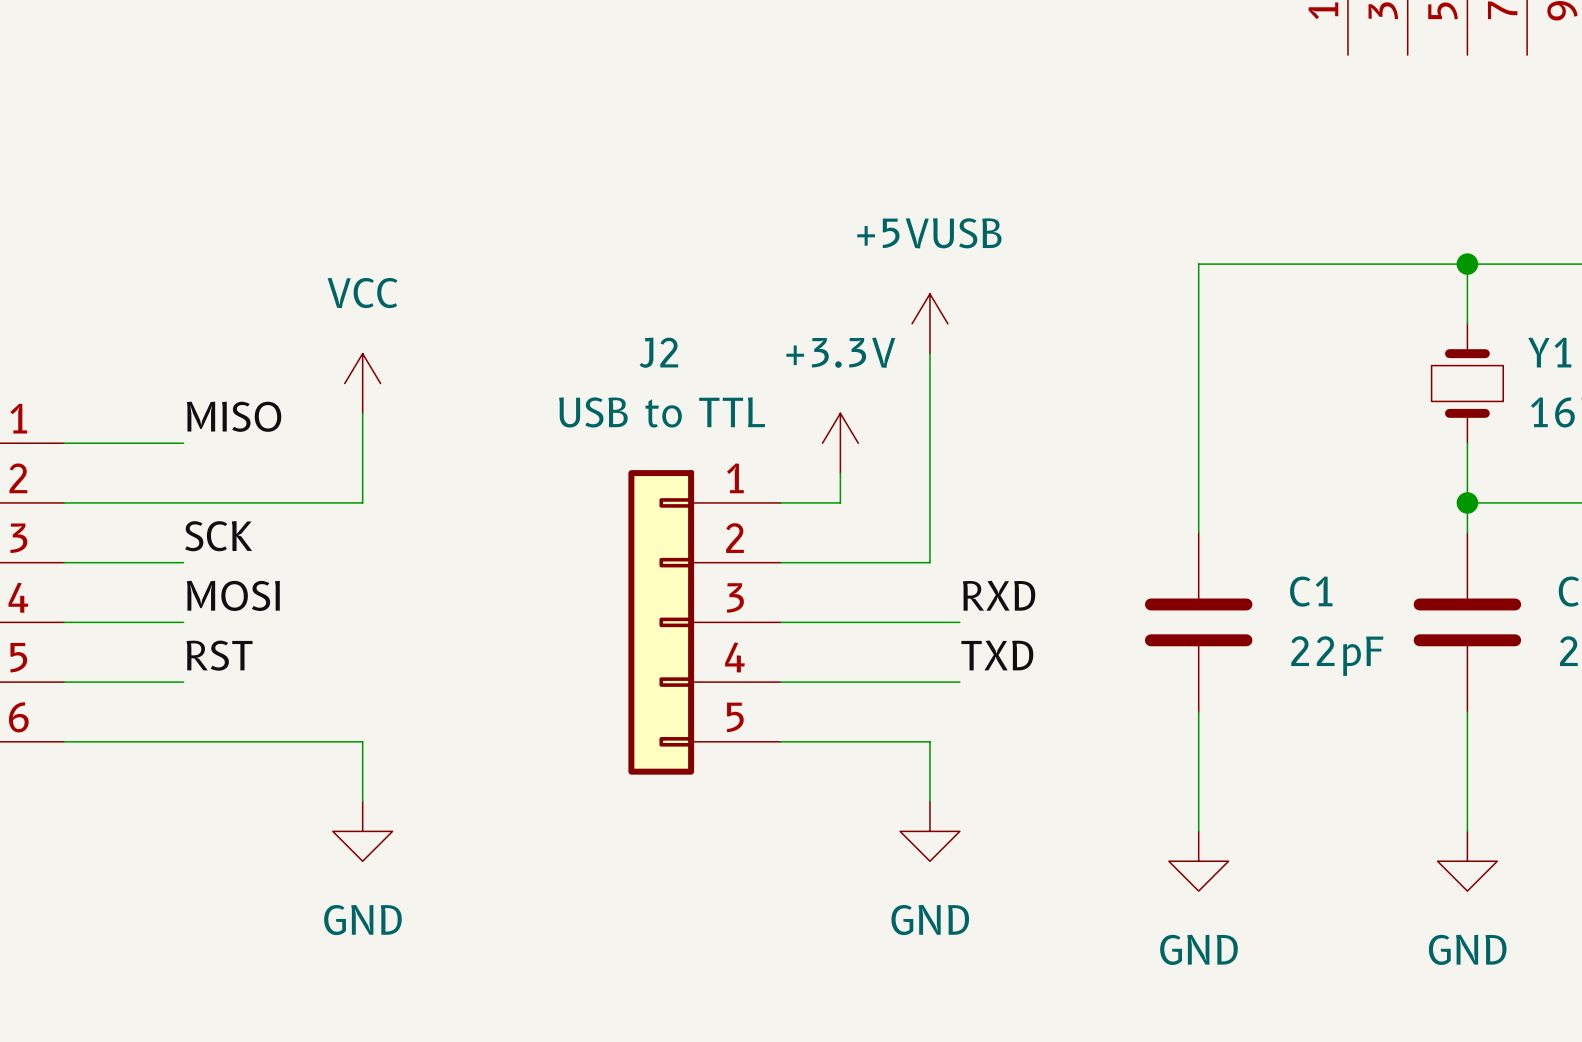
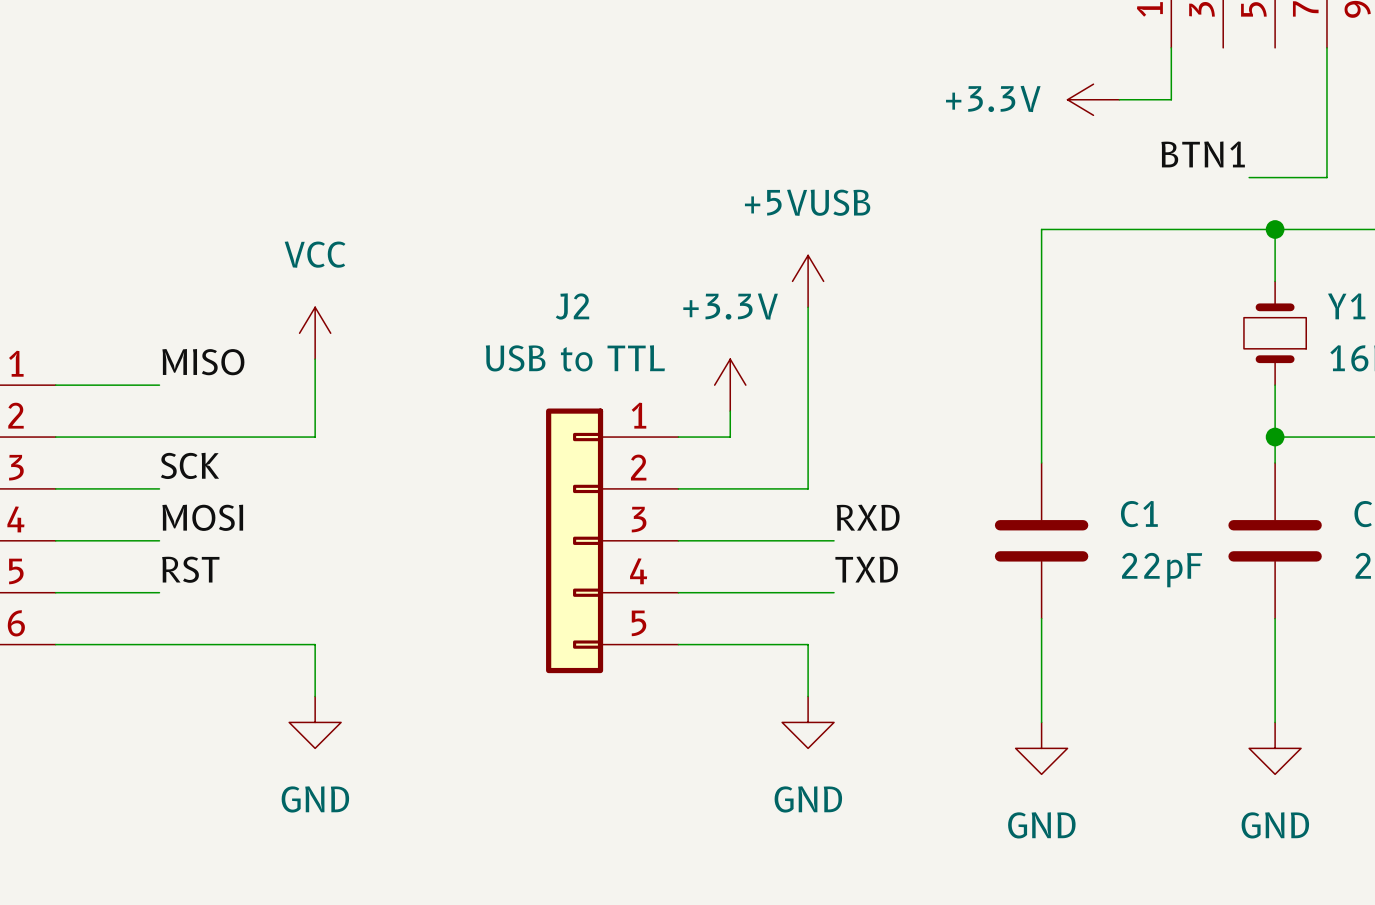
wire: none -> (1171, 47) (1171, 99) (1119, 99)
wire: none -> (1326, 47) (1326, 177) (1249, 177)
power symbol: none -> +3.3V (1093, 99)
label: none -> BTN1 (1203, 154)

